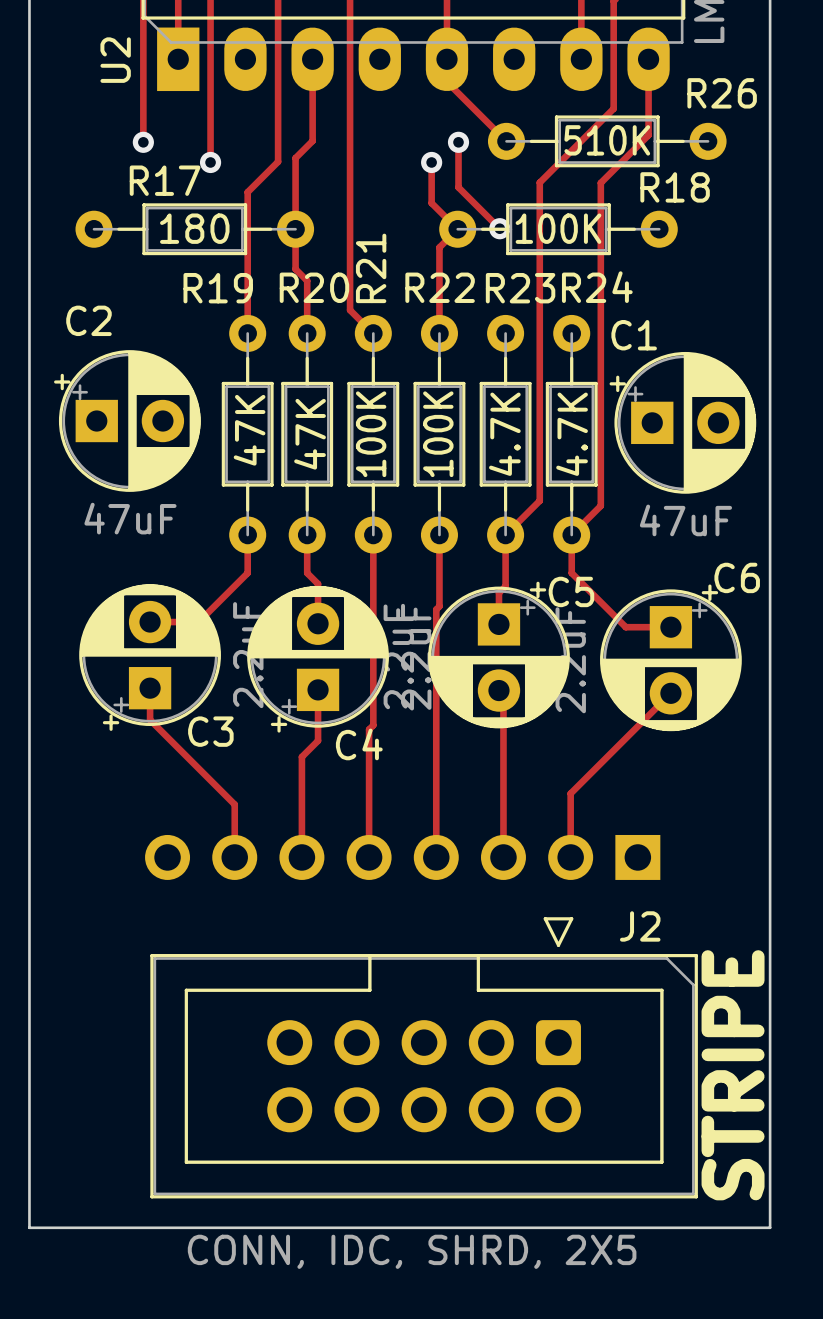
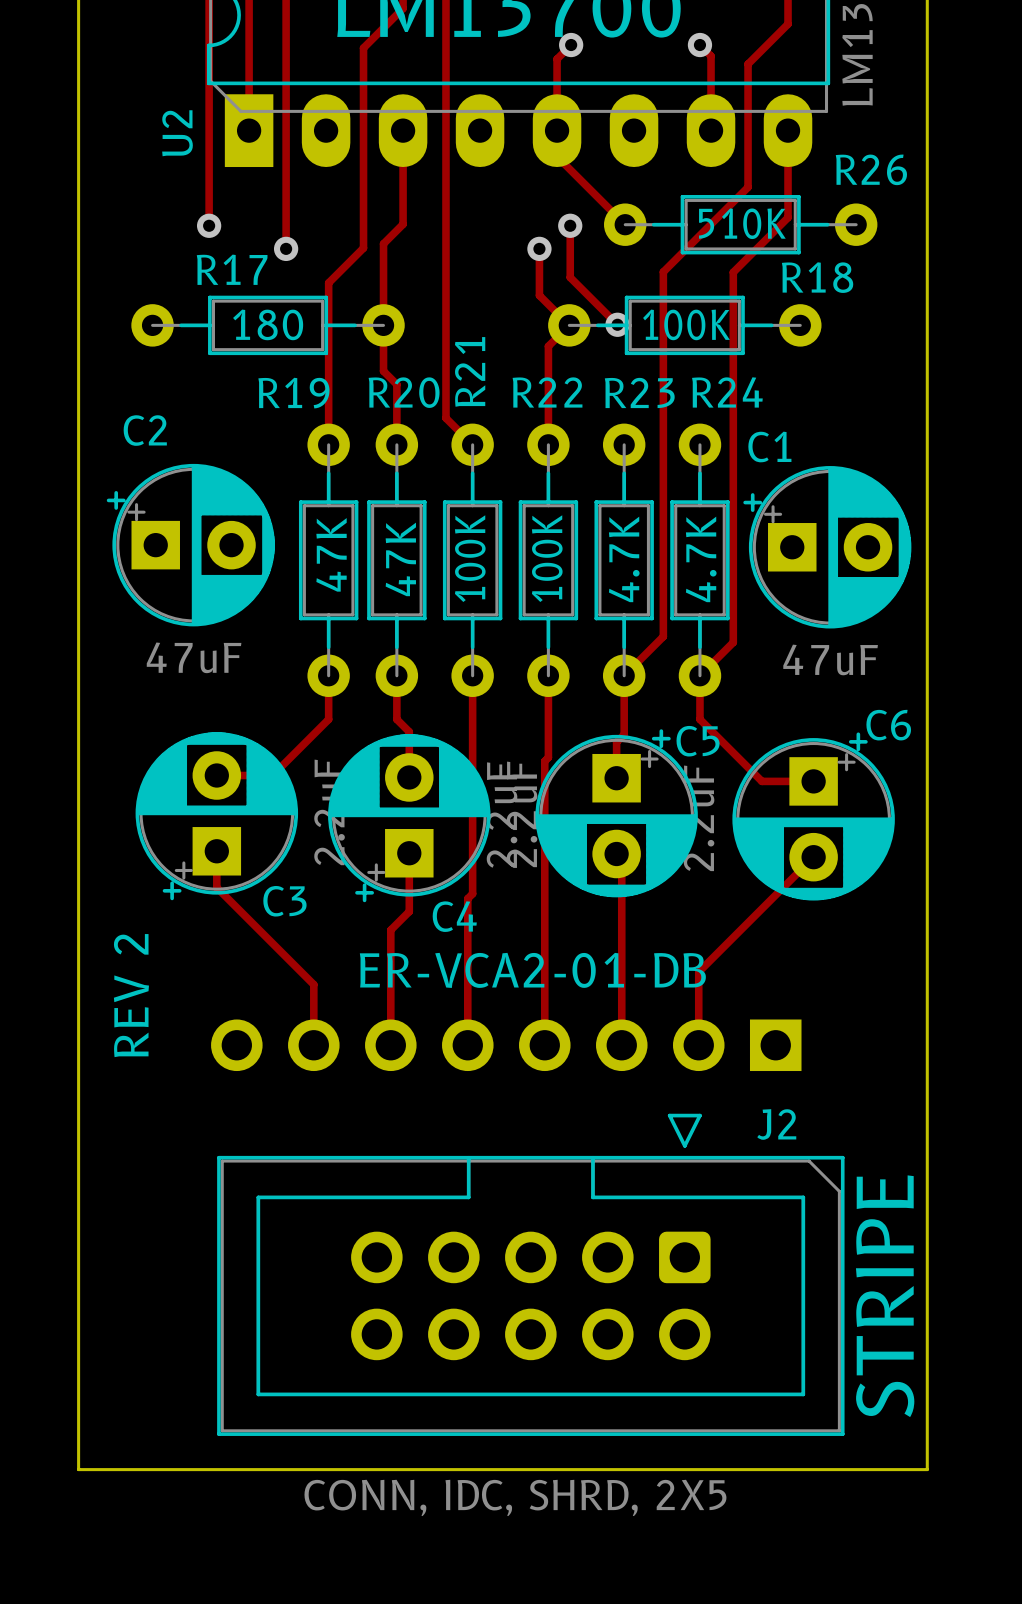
text: none -> ER-VCA2-01-DB (532, 970)
text: none -> REV 2 (131, 995)

